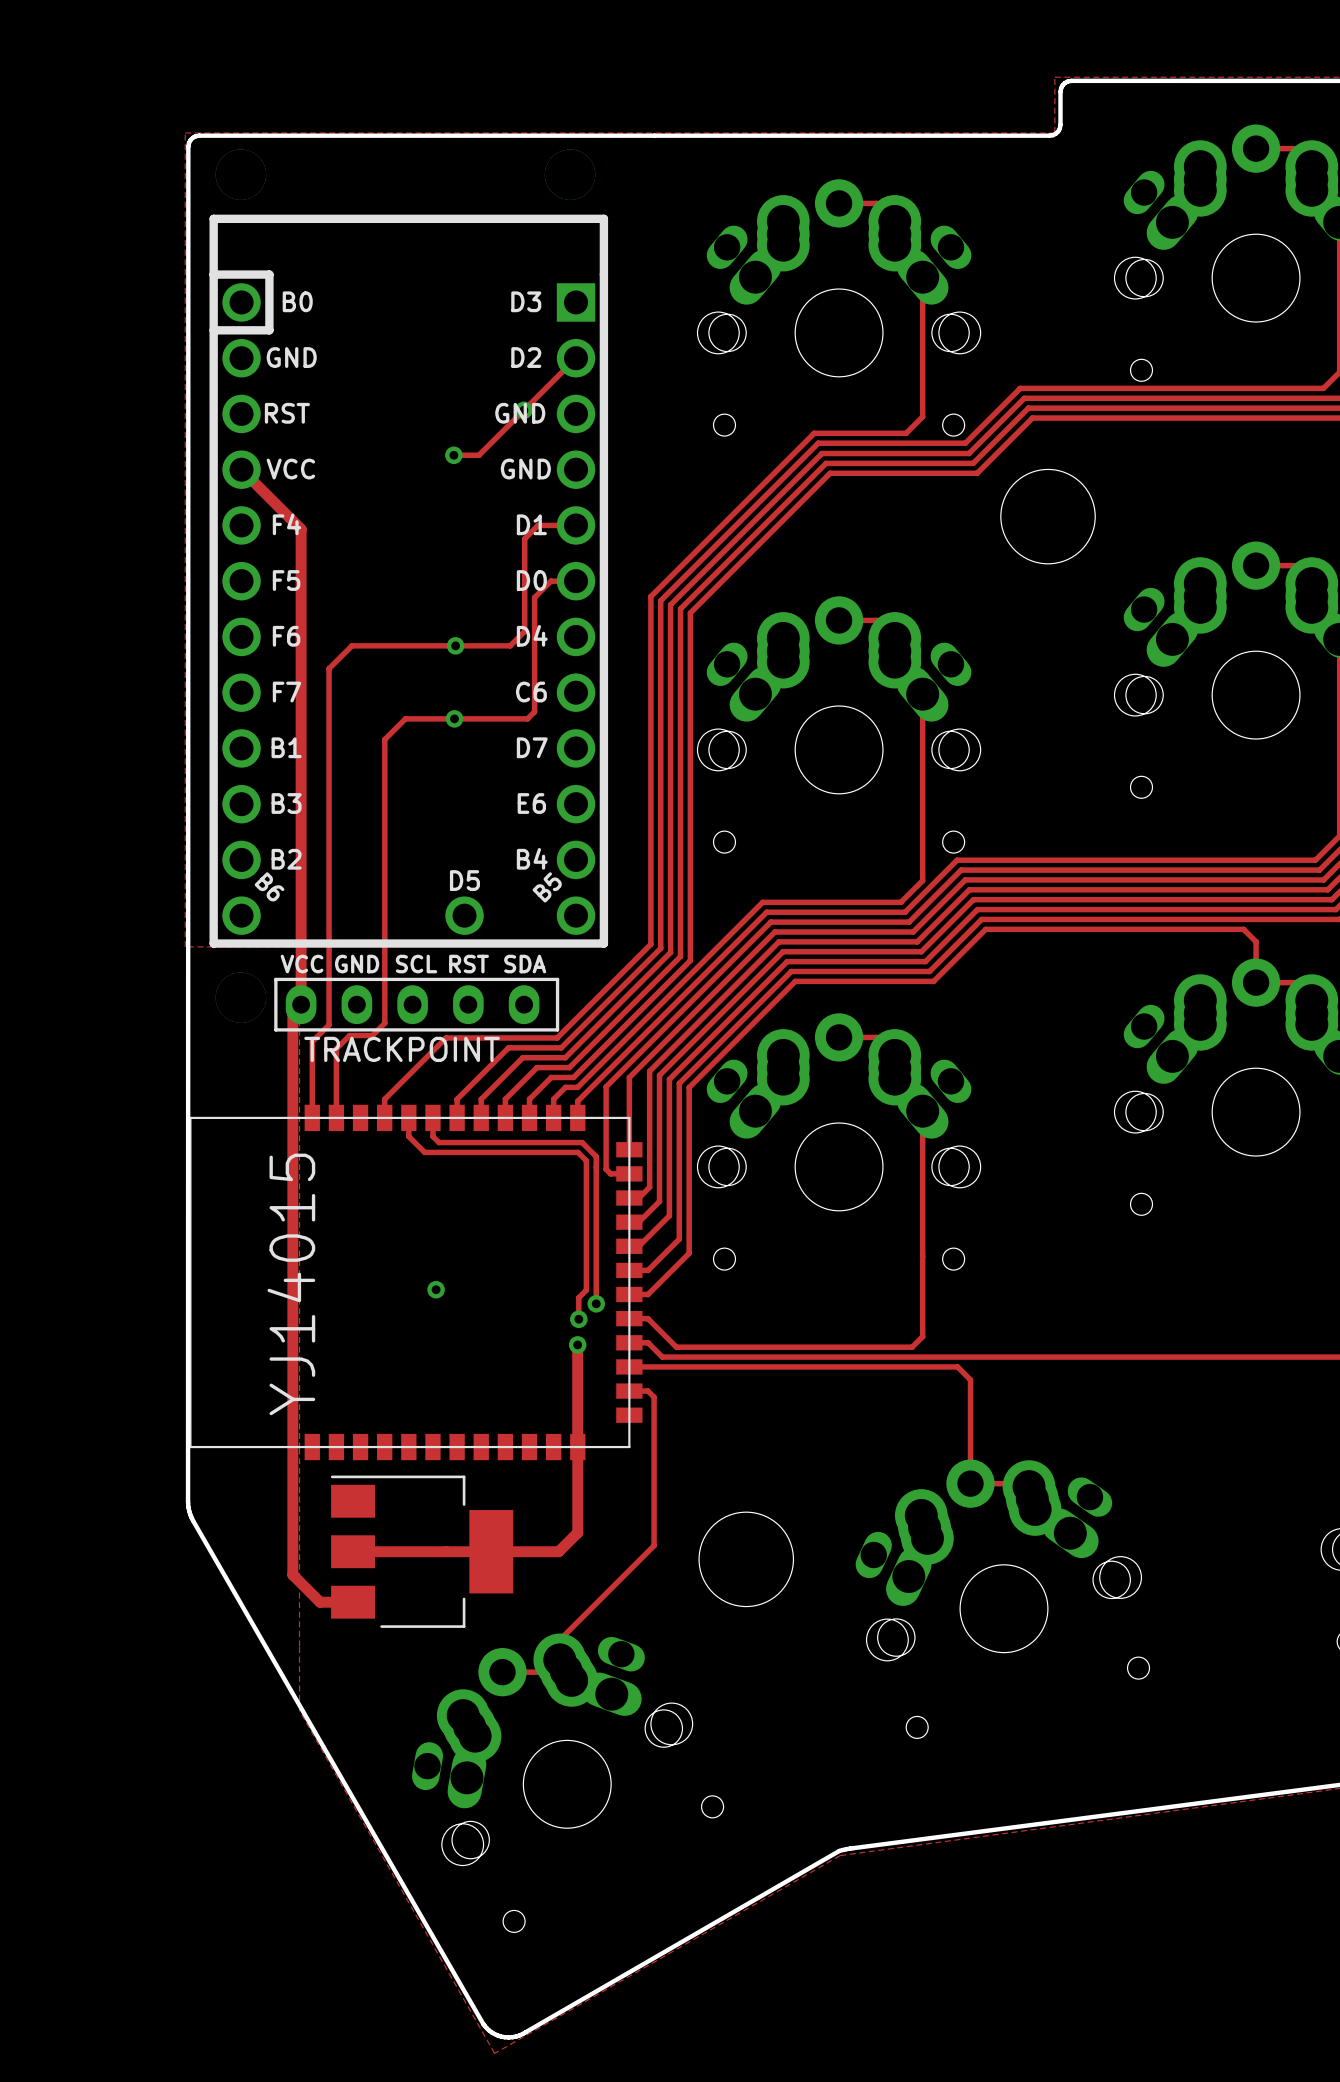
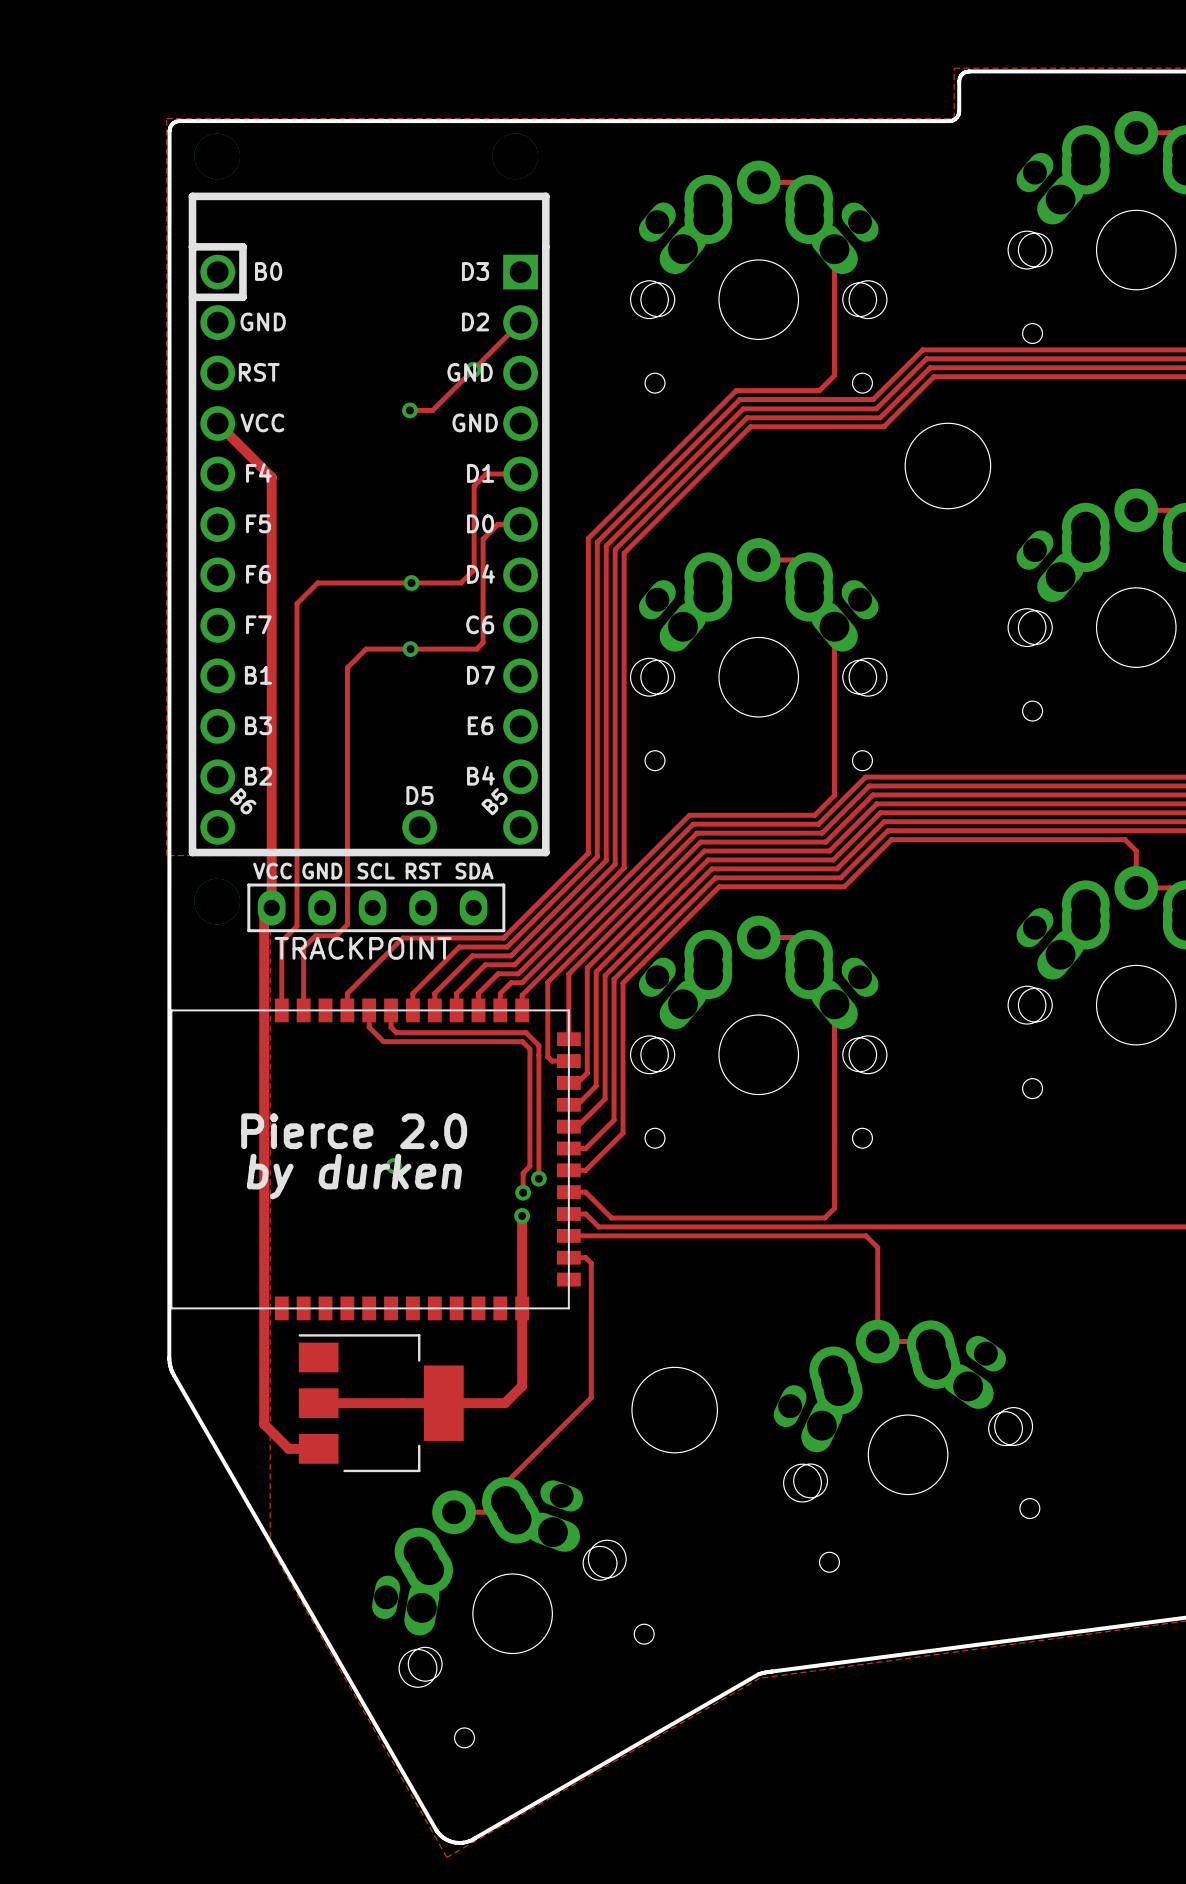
text: none -> Pierce 2.0 (354, 1131)
part value: YJ14015 (291, 1284) -> none
text: none -> by durken (354, 1176)

